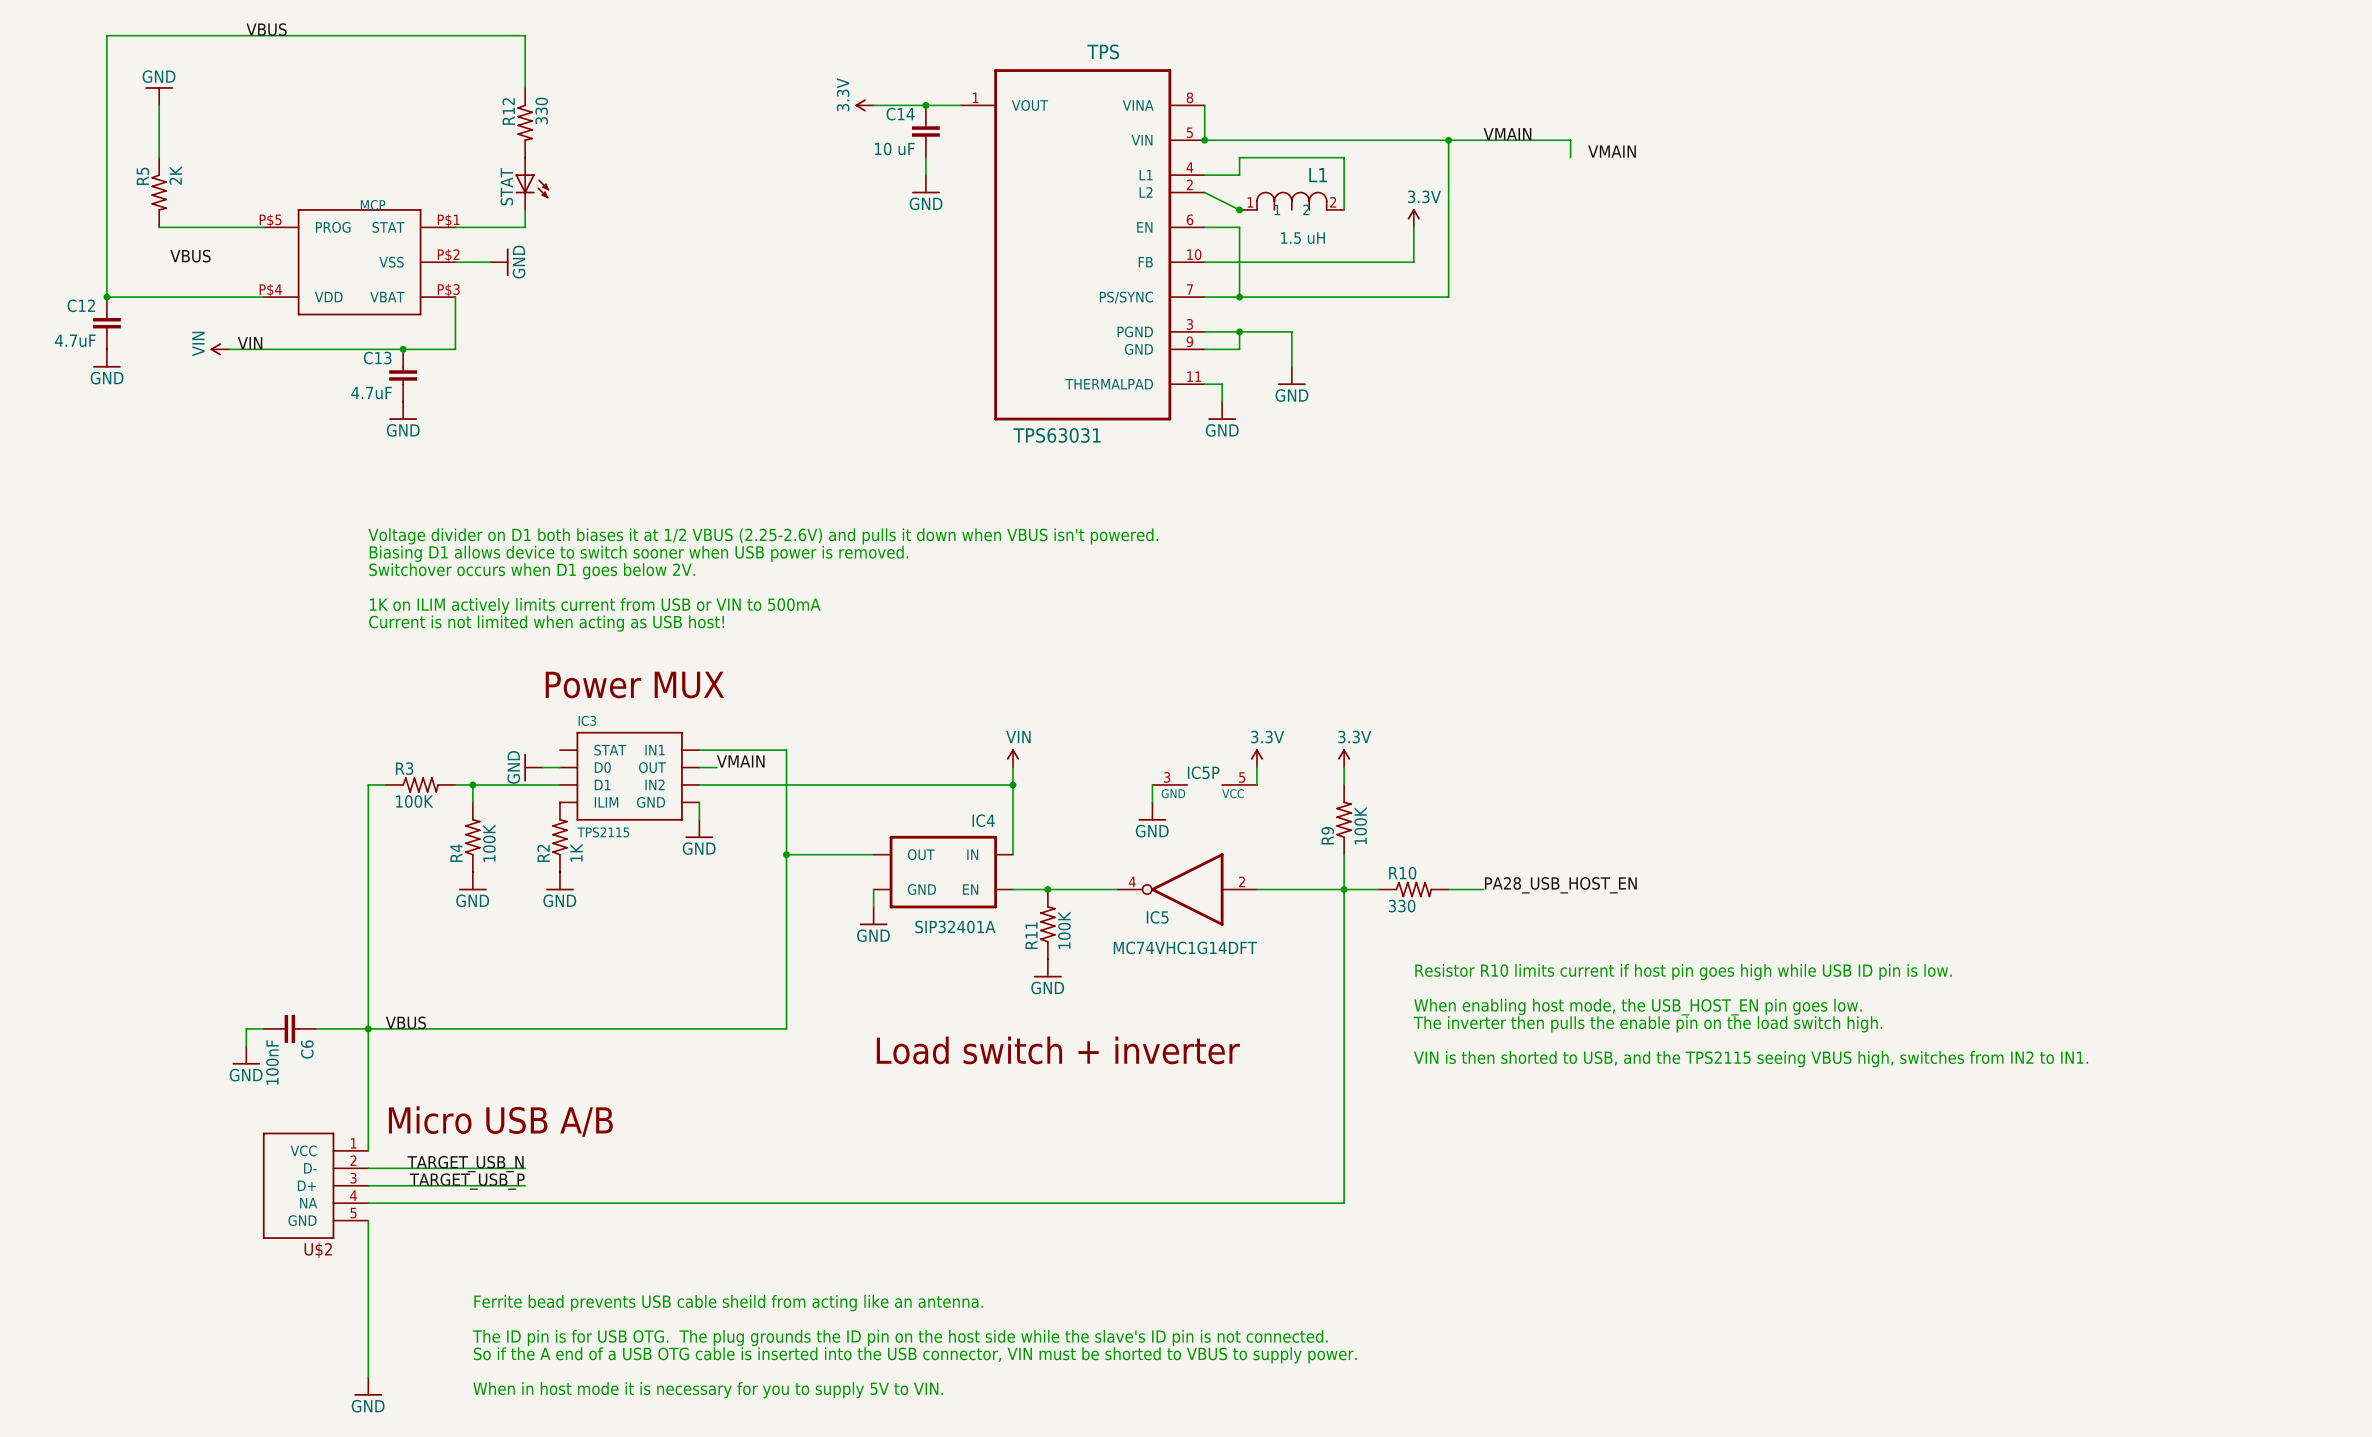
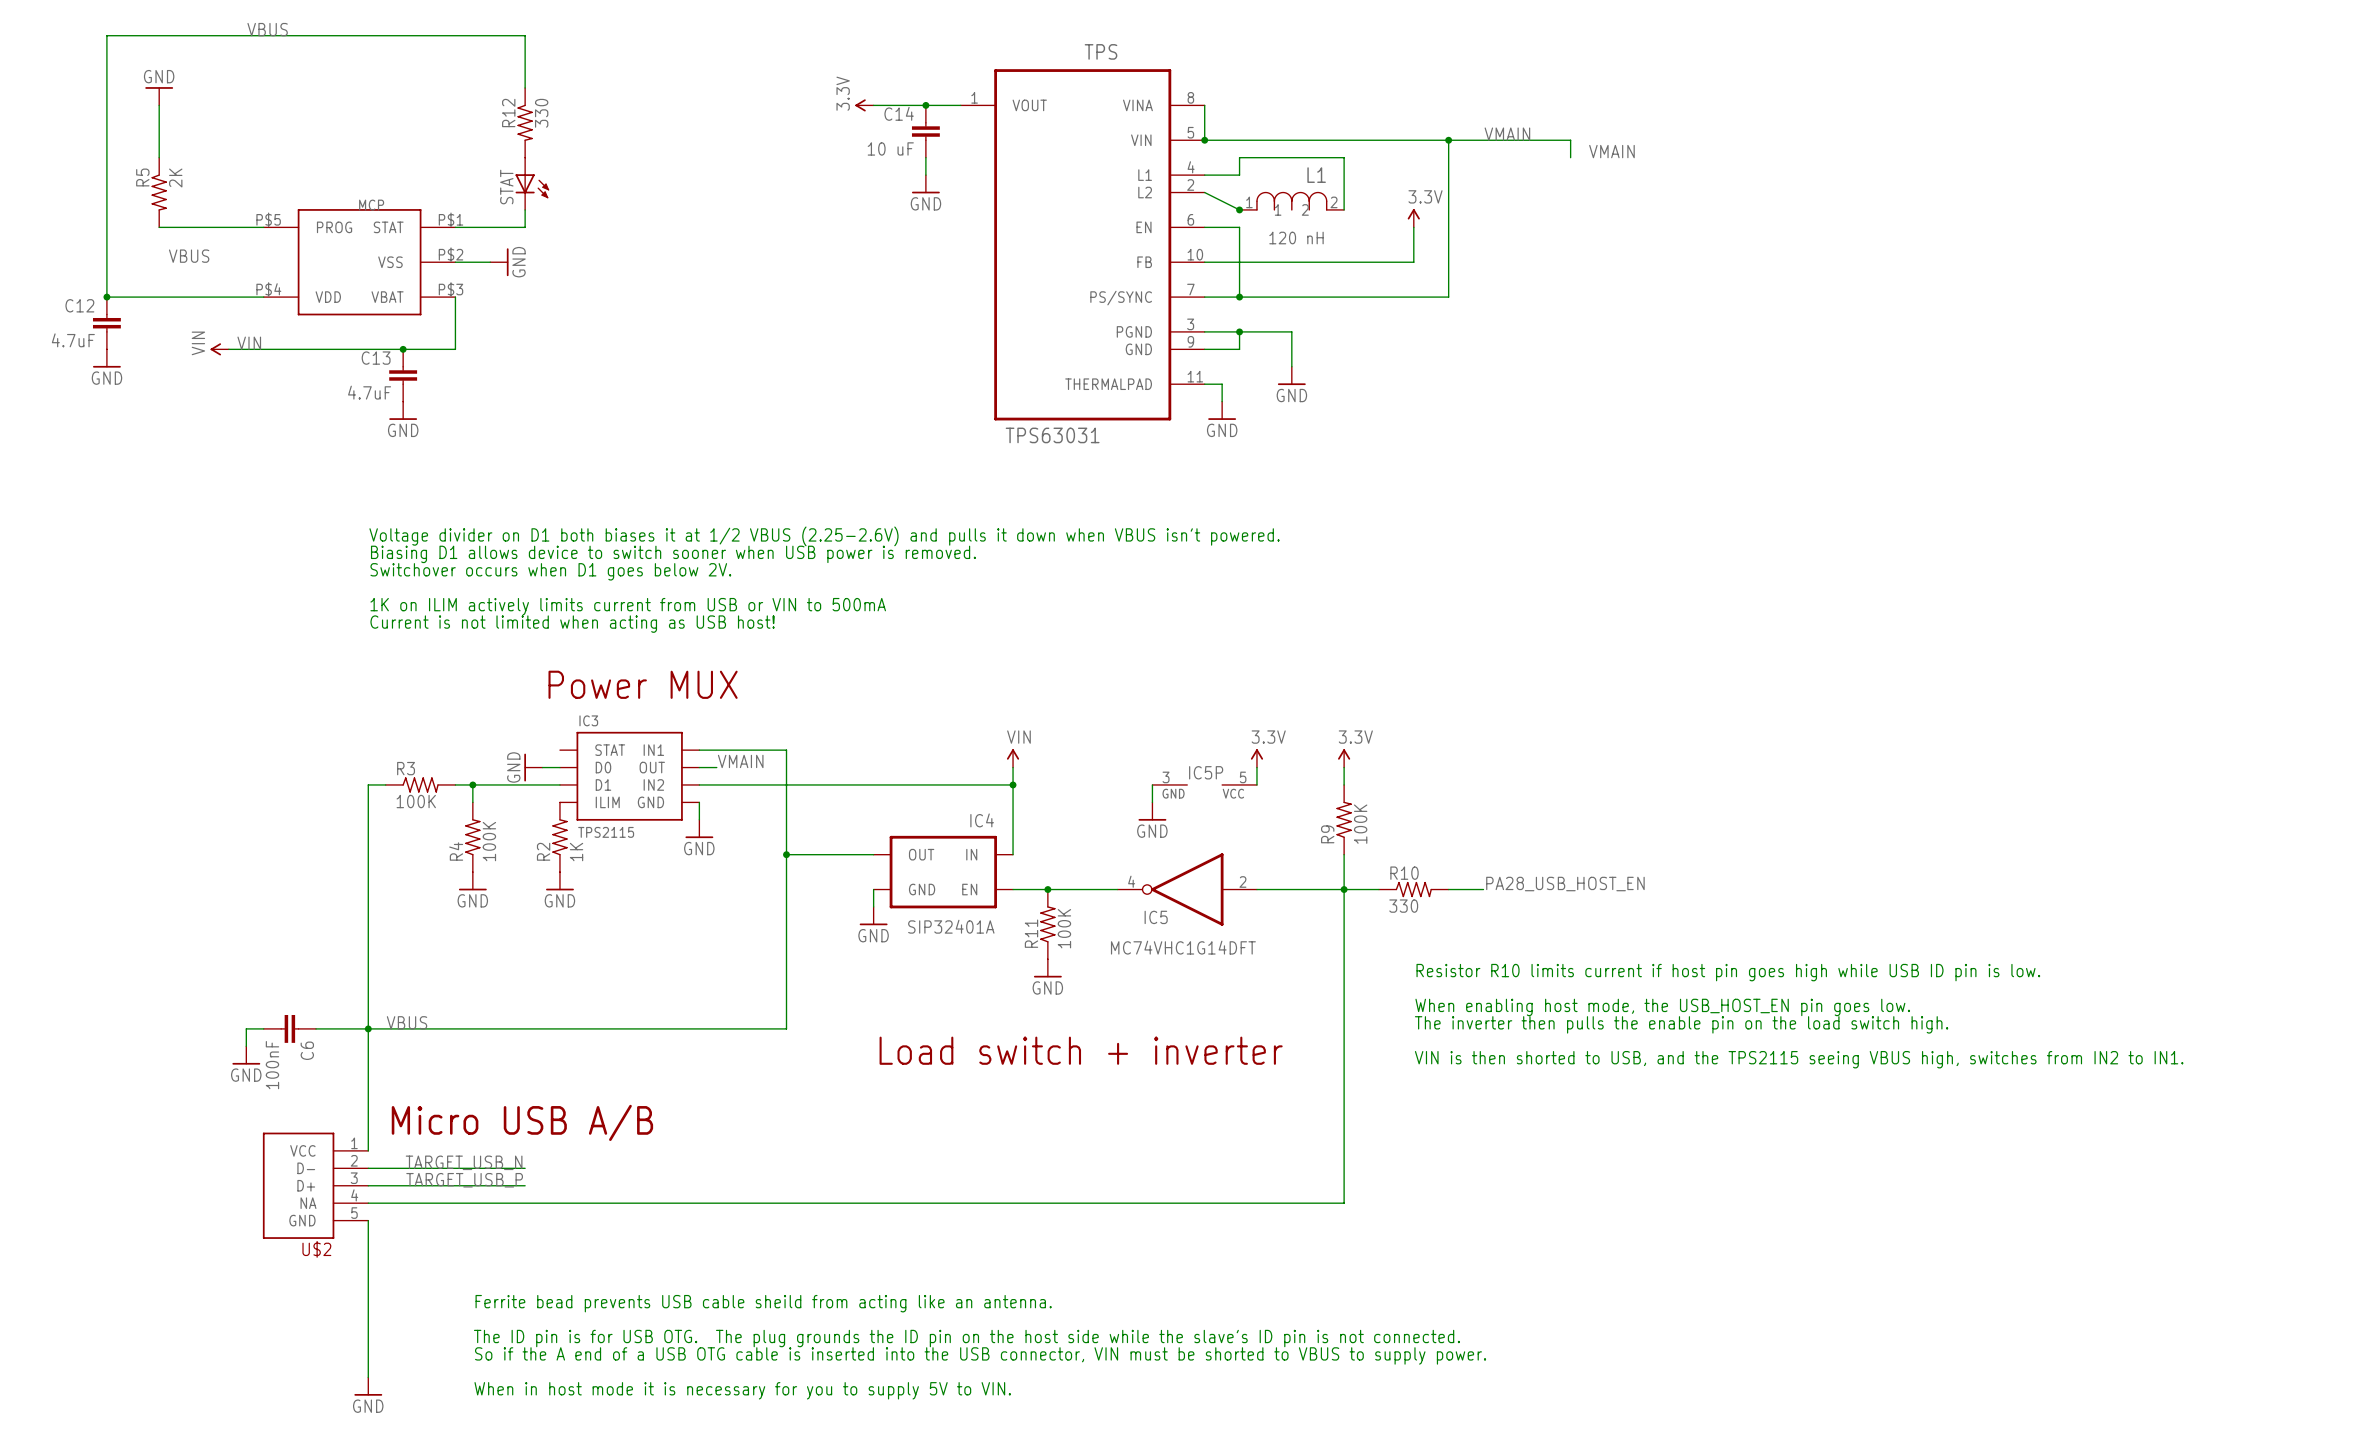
L1 value: 1.5 uH (1303, 238) -> 120 nH (1296, 238)

